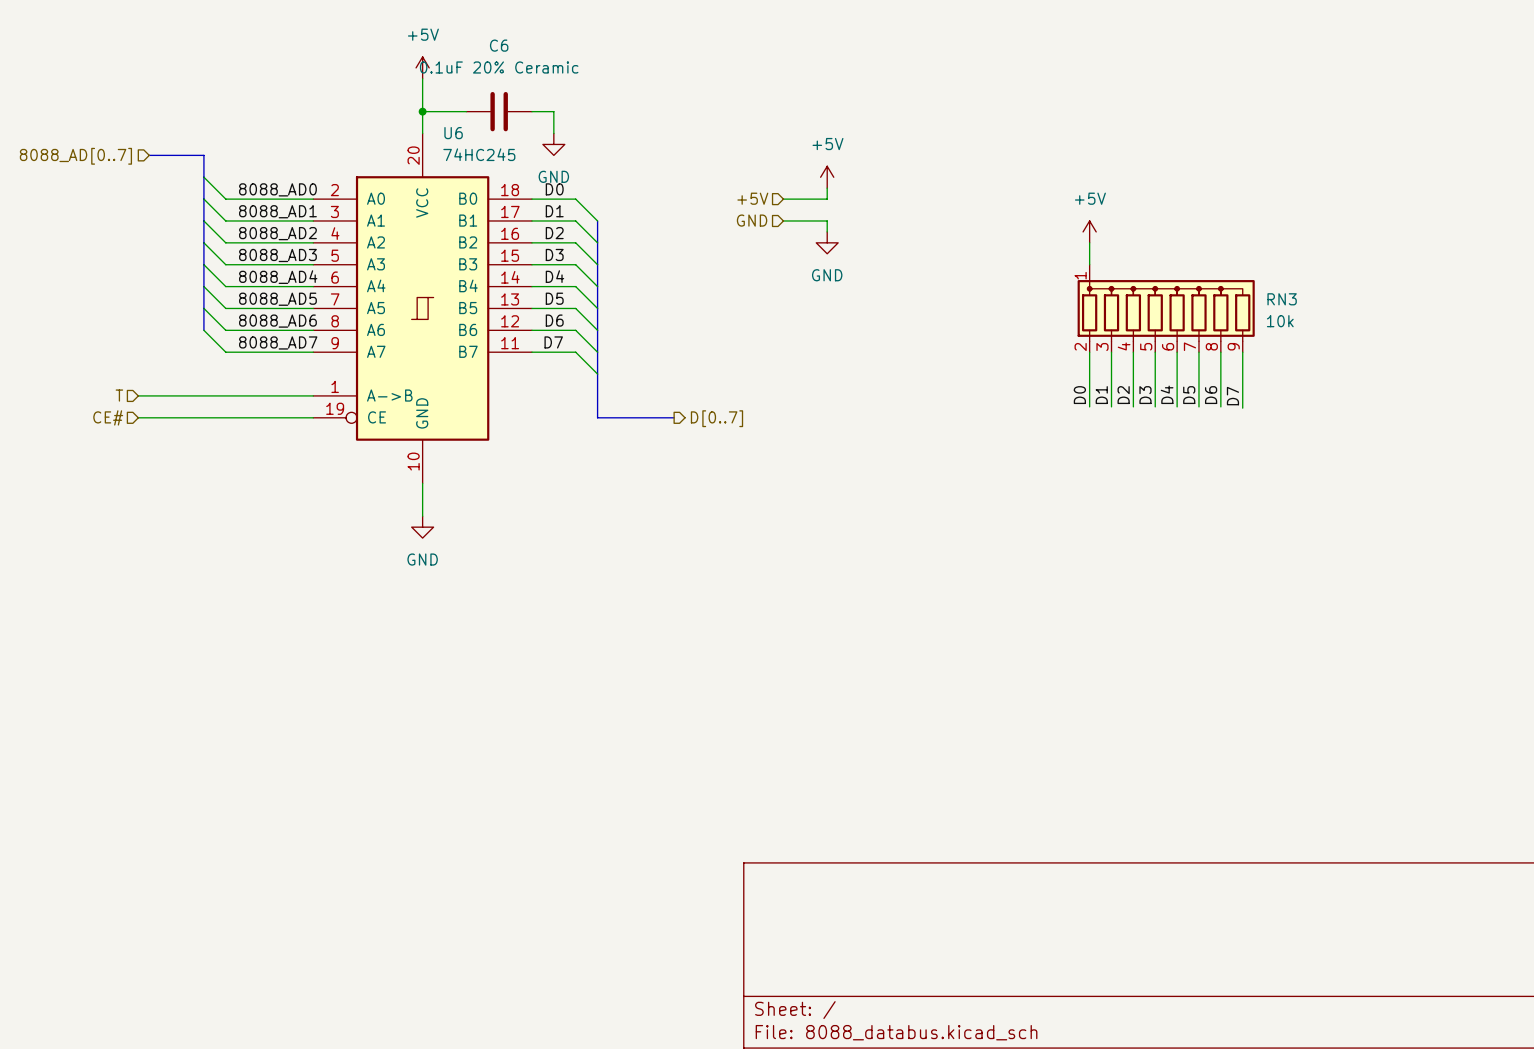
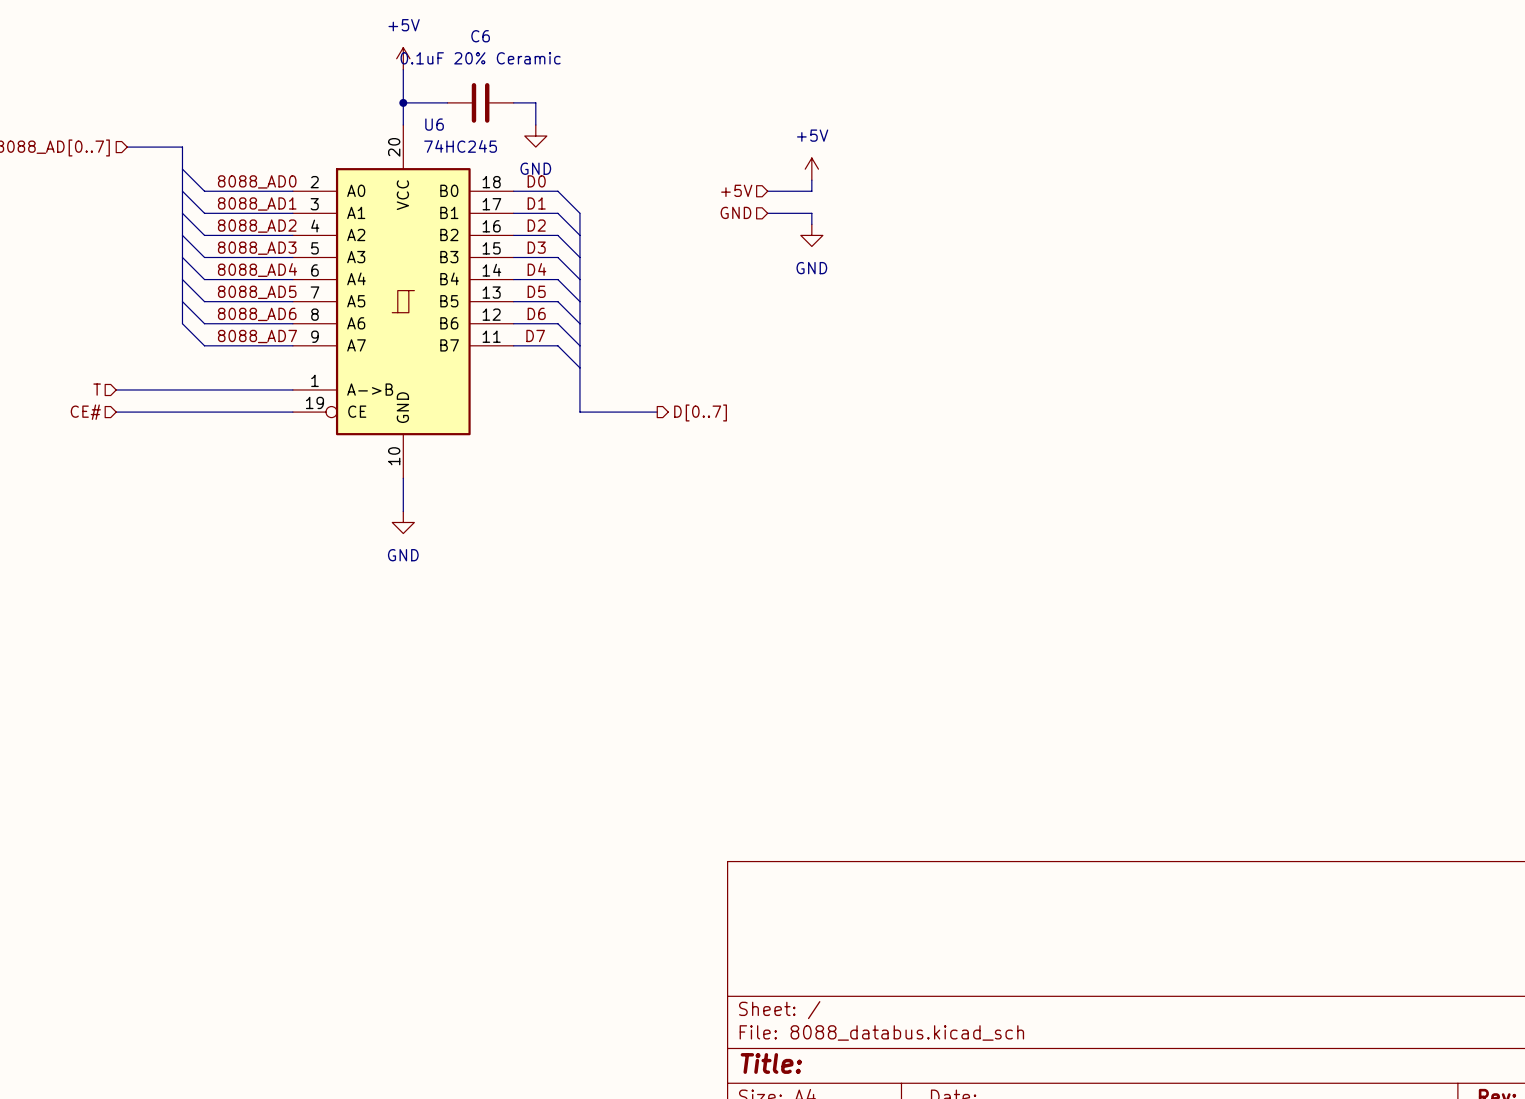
power symbol: +5V (1089, 231) -> none
wire: (1089, 242) (1089, 264) -> none
RN3: 10k (1166, 308) -> none
wire: (1089, 352) (1089, 406) -> none
wire: (1111, 352) (1111, 406) -> none
wire: (1133, 352) (1133, 406) -> none
wire: (1155, 352) (1155, 406) -> none
wire: (1177, 352) (1177, 406) -> none
wire: (1198, 352) (1198, 406) -> none
wire: (1220, 352) (1220, 406) -> none
wire: (1242, 352) (1242, 408) -> none
label: D4 (1167, 394) -> none
label: D0 (1079, 395) -> none
label: D1 (1101, 395) -> none
label: D2 (1123, 395) -> none
label: D3 (1145, 395) -> none
label: D5 (1189, 395) -> none
label: D6 (1211, 395) -> none
label: D7 (1232, 396) -> none

